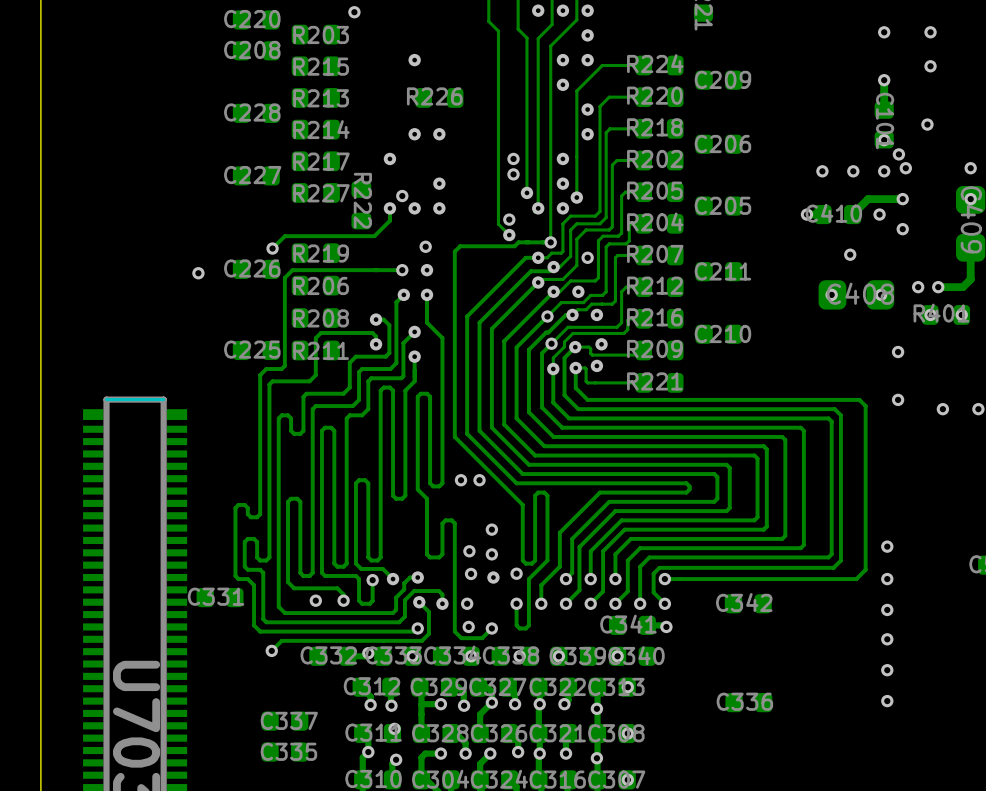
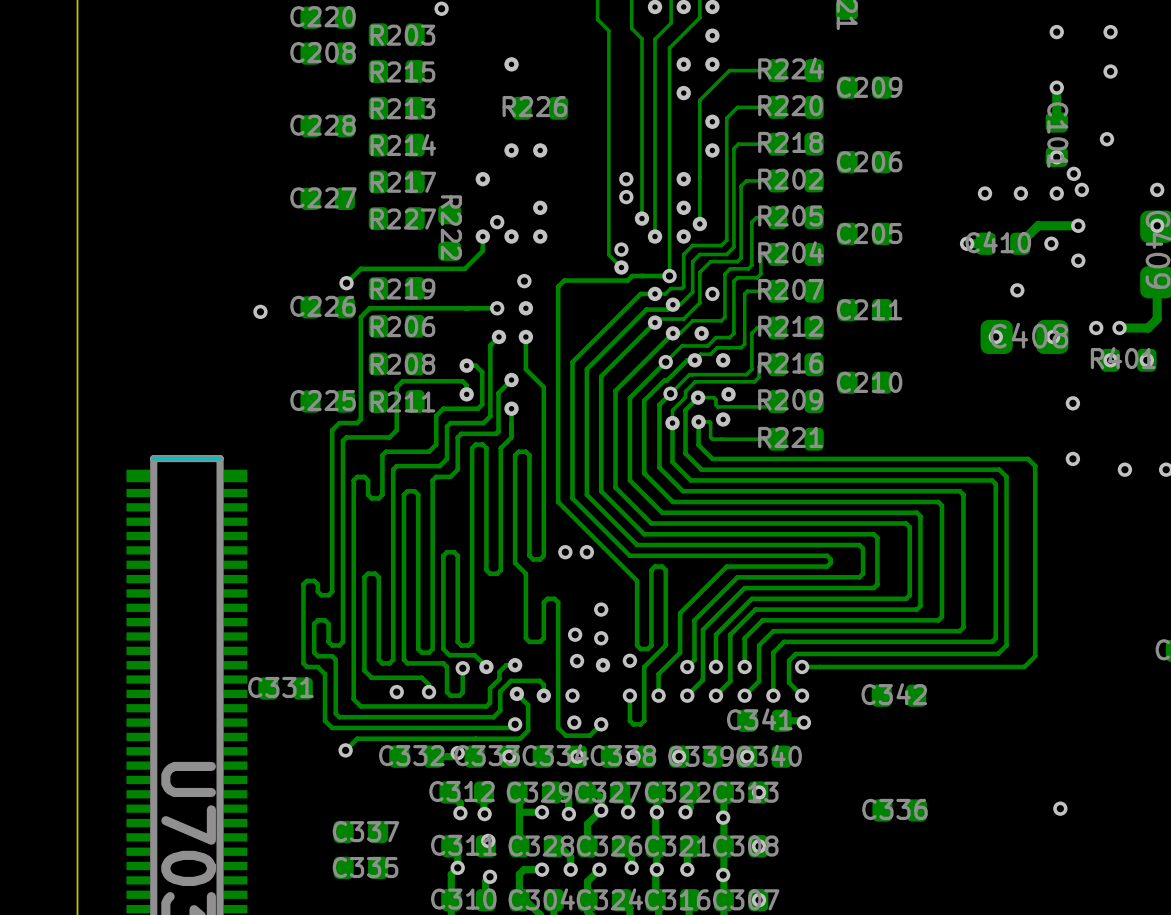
via: (887, 546) -> none
via: (887, 579) -> none
via: (887, 609) -> none
via: (887, 639) -> none
via: (887, 670) -> none

